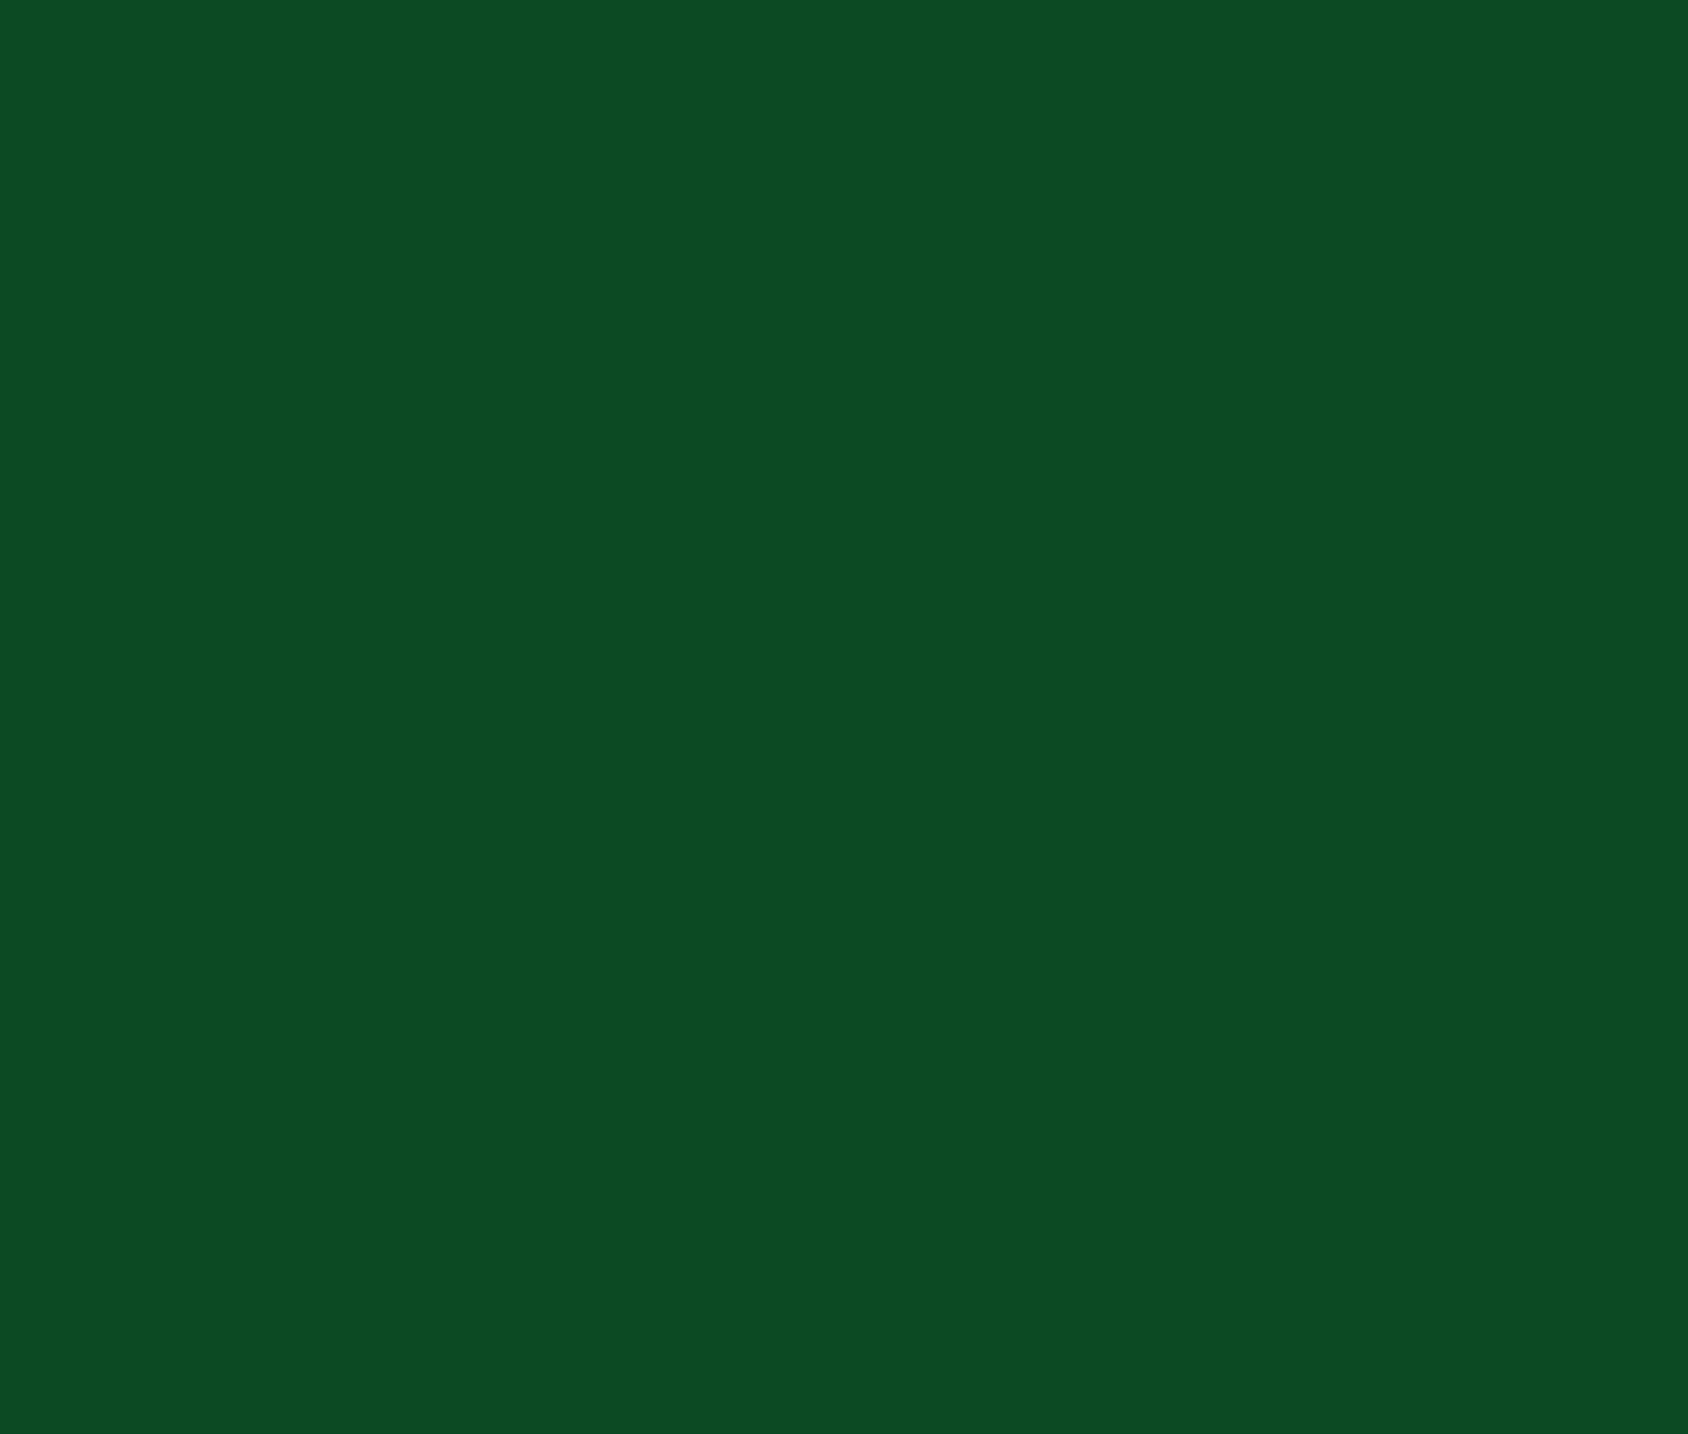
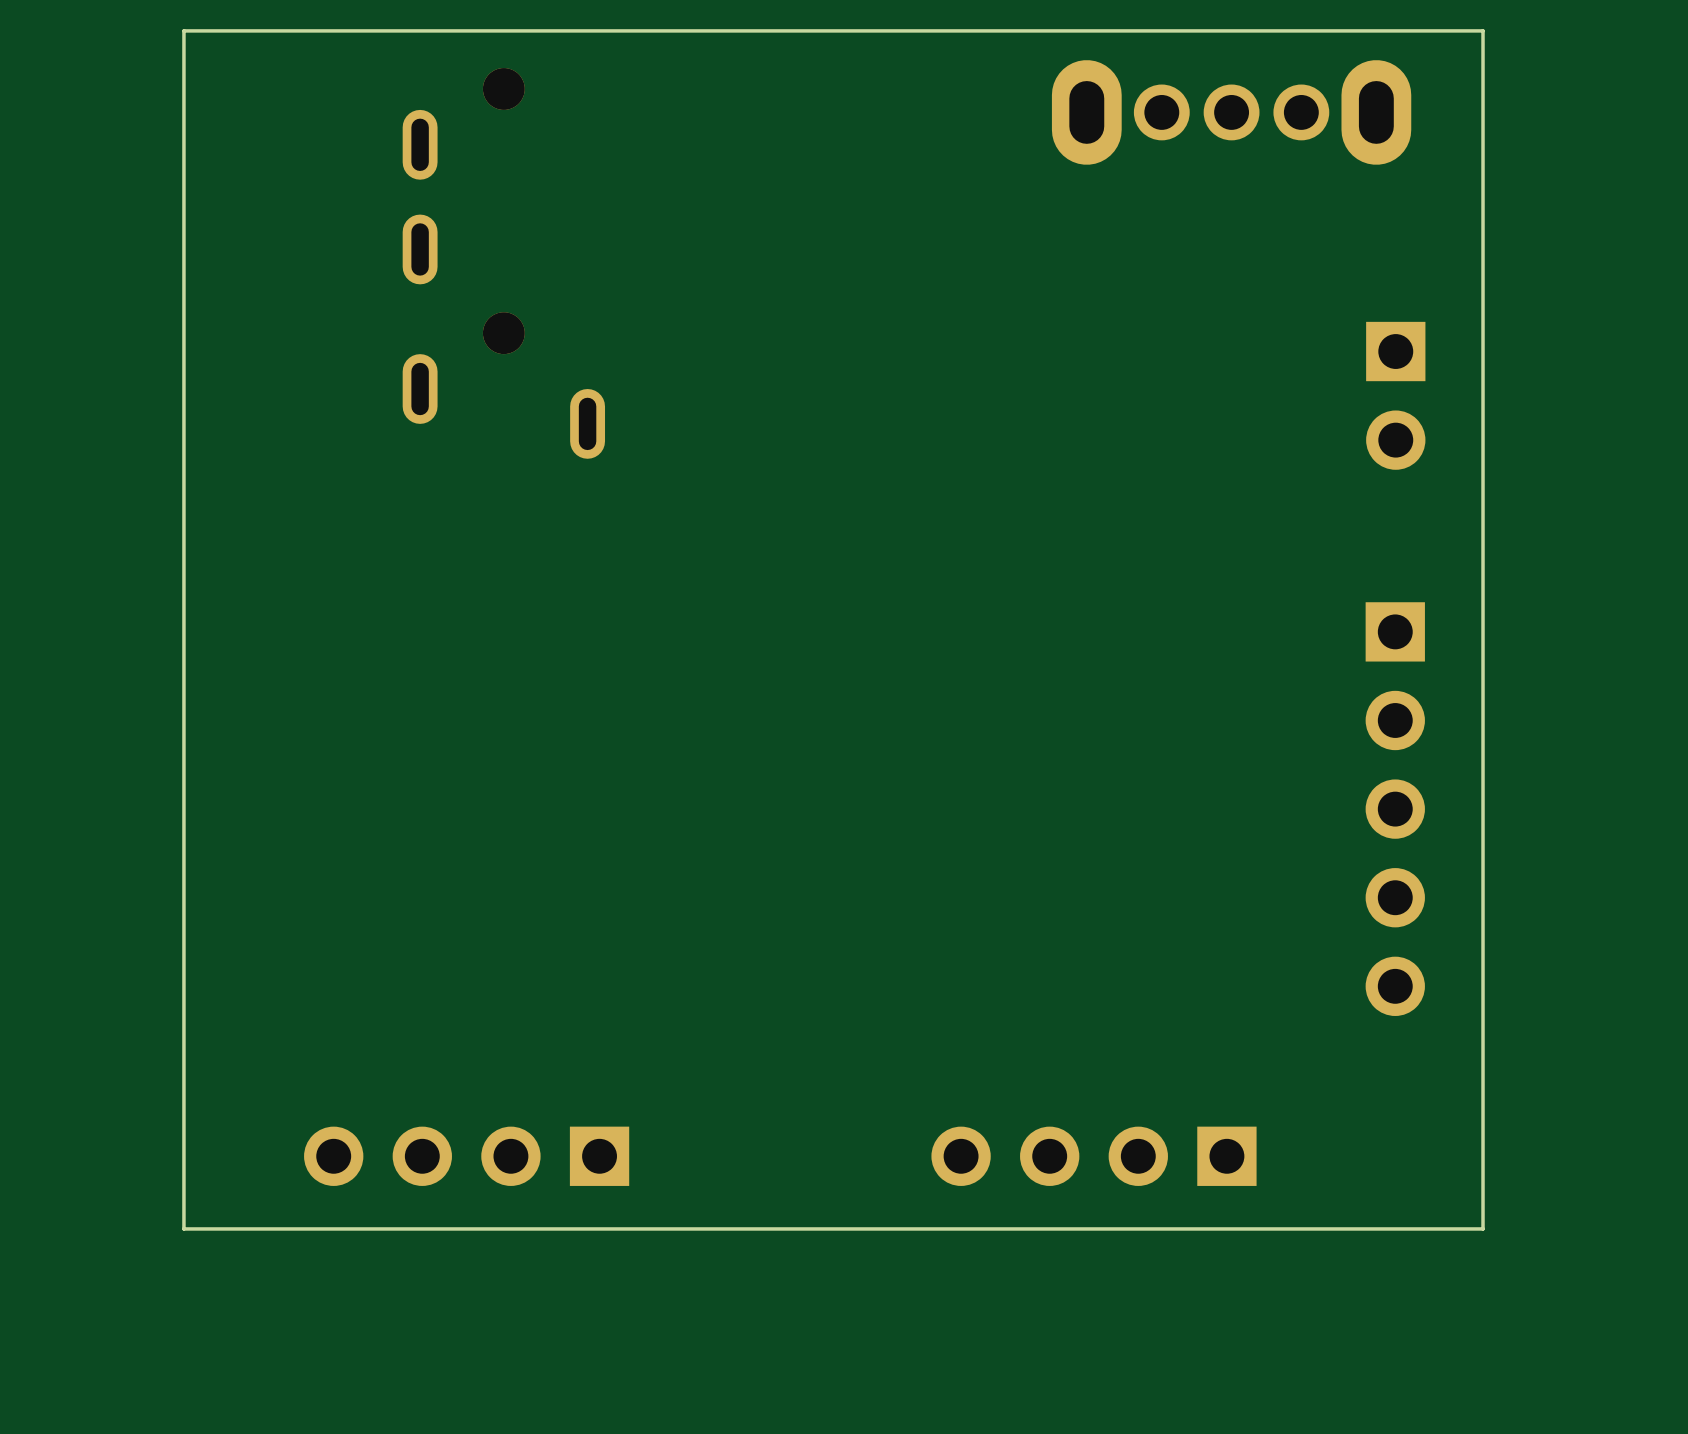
board edge: none -> (1483, 30) (183, 30) (183, 1228) (1483, 1228) (1483, 30)
part: none -> (1231, 112)
part: none -> (503, 263)
part: none -> (1395, 395)
part: none -> (1395, 809)
part: none -> (466, 1156)
part: none -> (1094, 1156)

